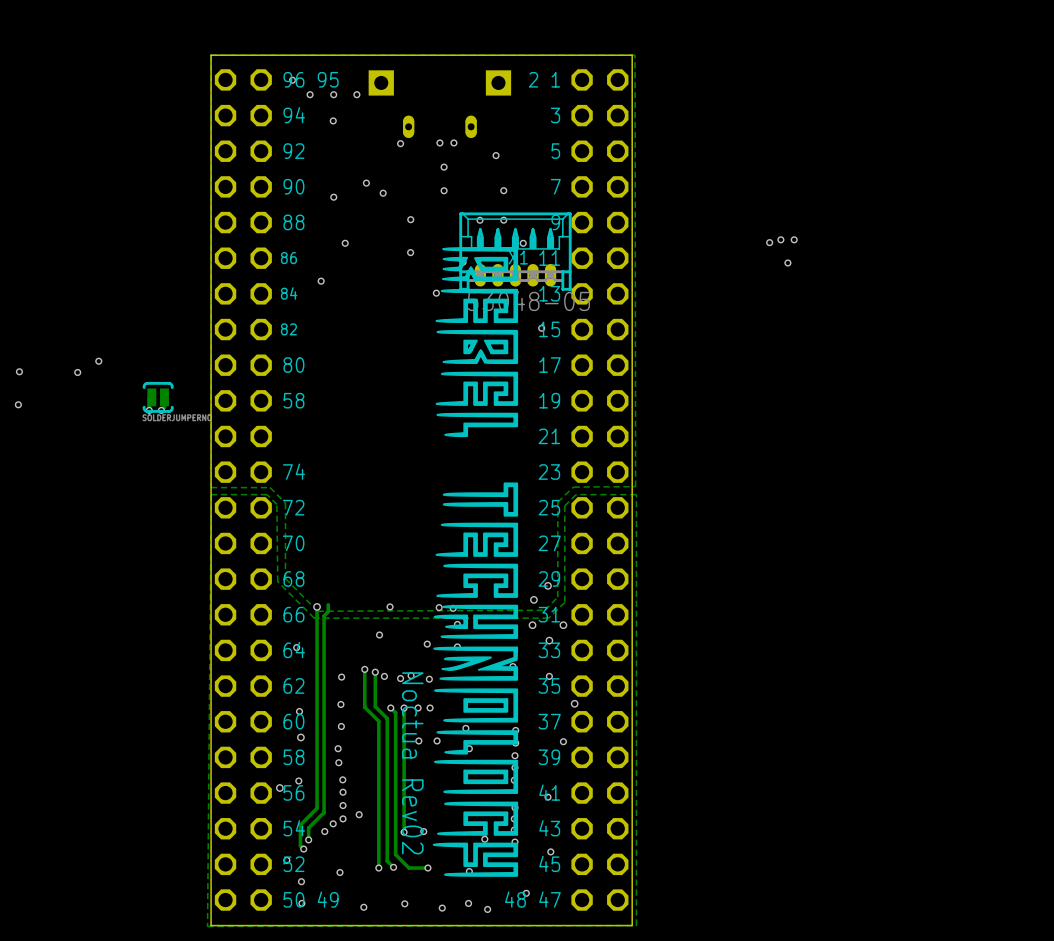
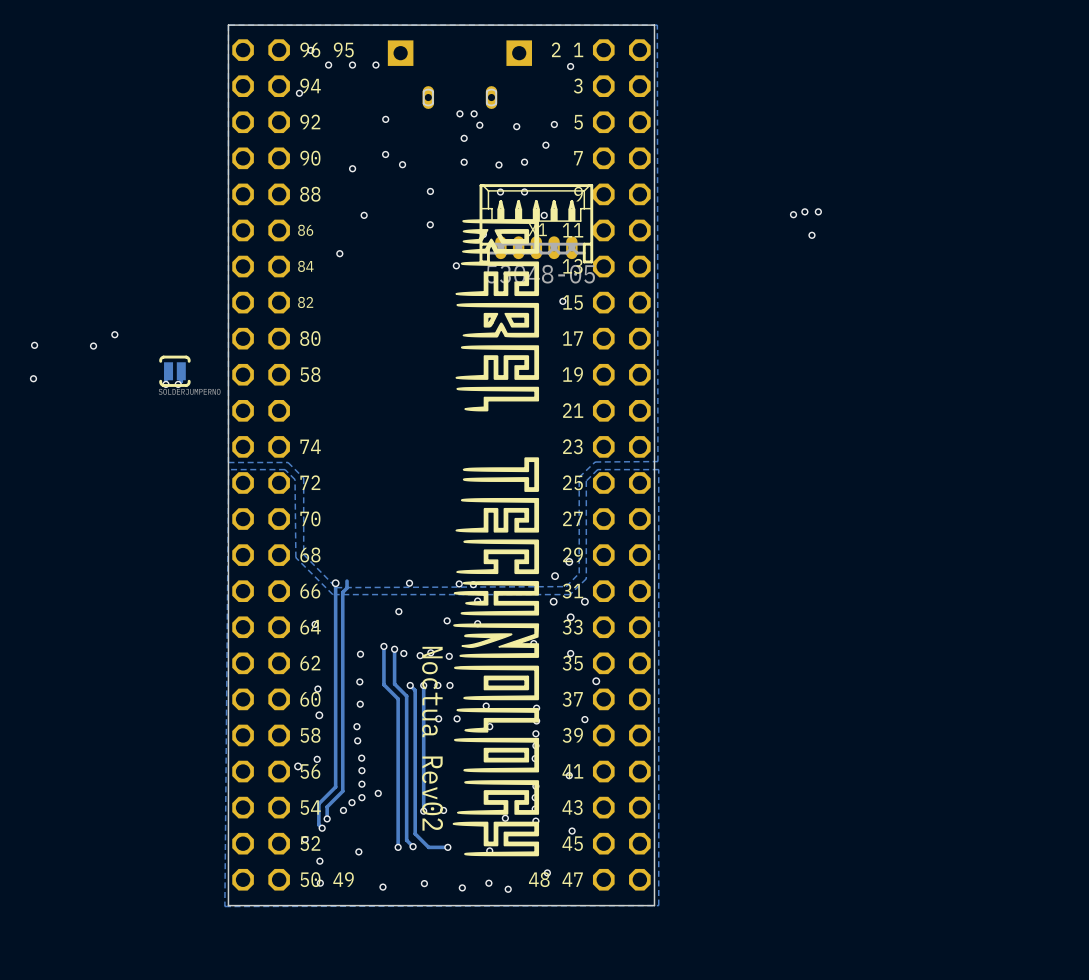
via: none -> (570, 66)
via: (333, 120) -> none
via: none -> (299, 93)
via: (400, 143) -> none
via: none -> (385, 119)
via: none -> (554, 124)
via: none -> (479, 125)
via: none -> (545, 145)
via: none -> (498, 164)

